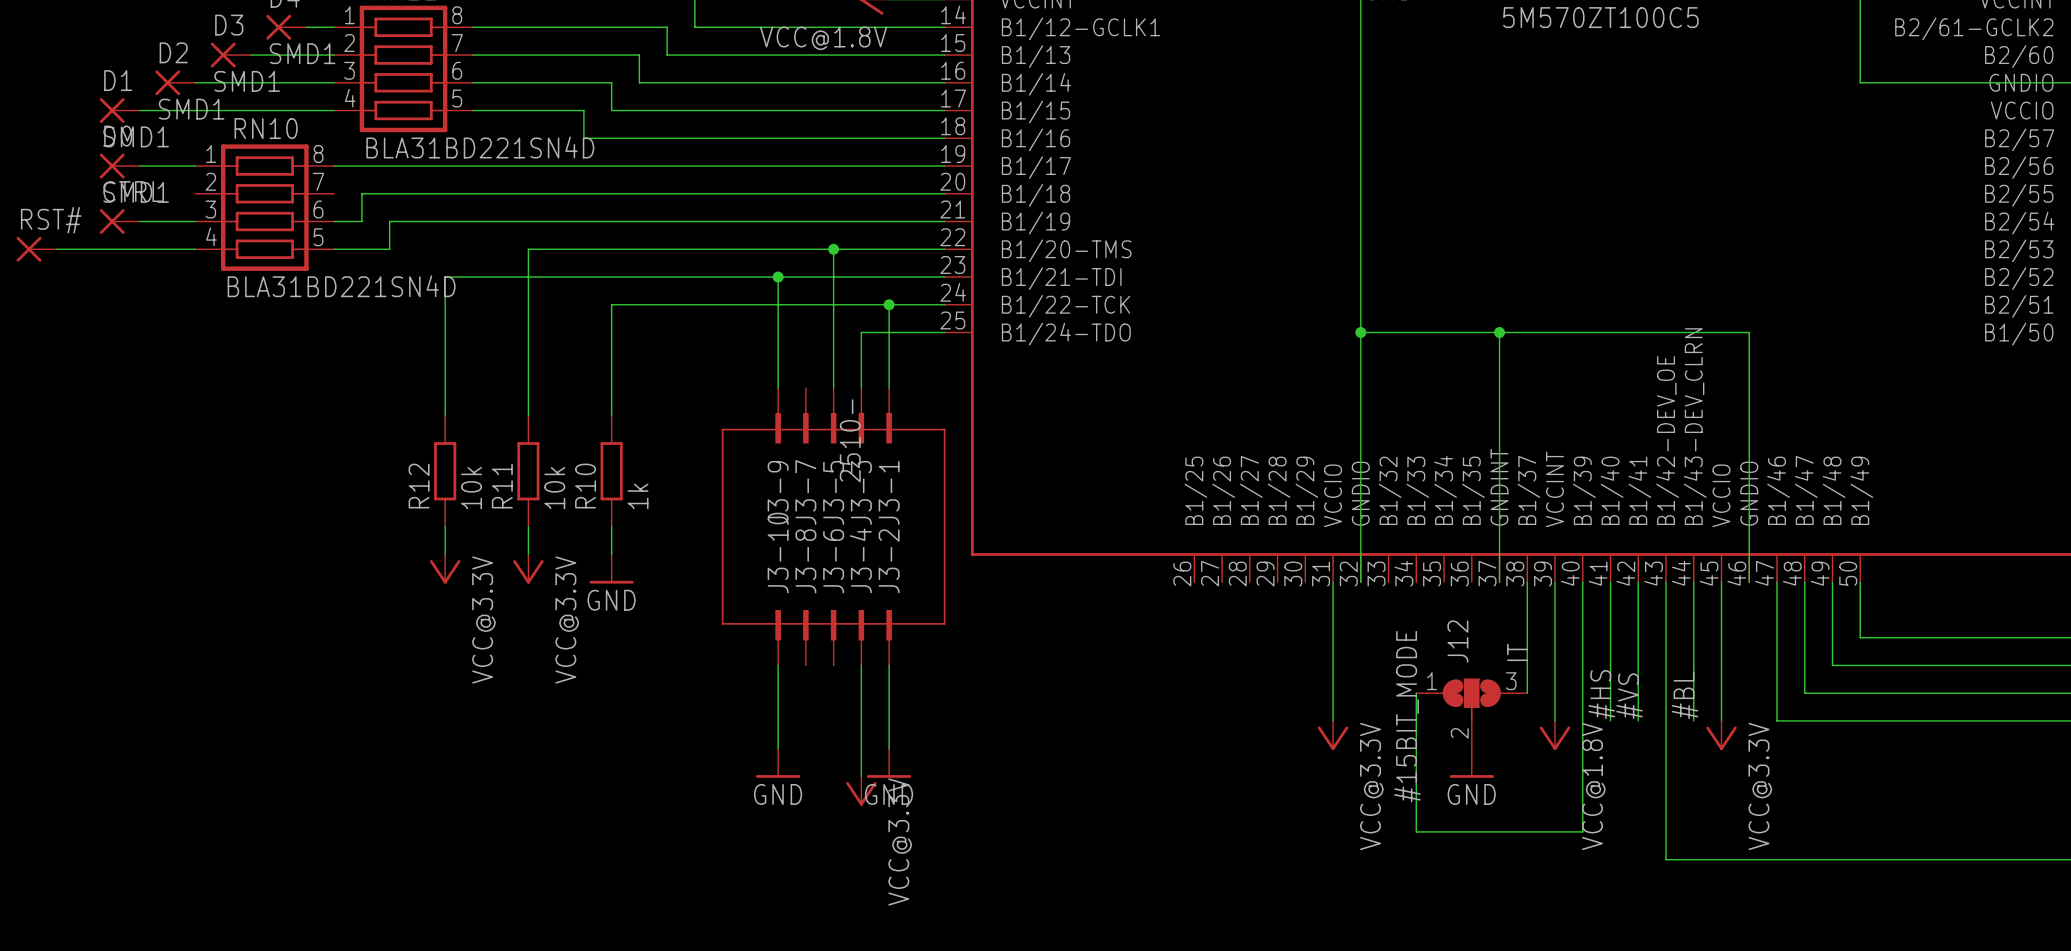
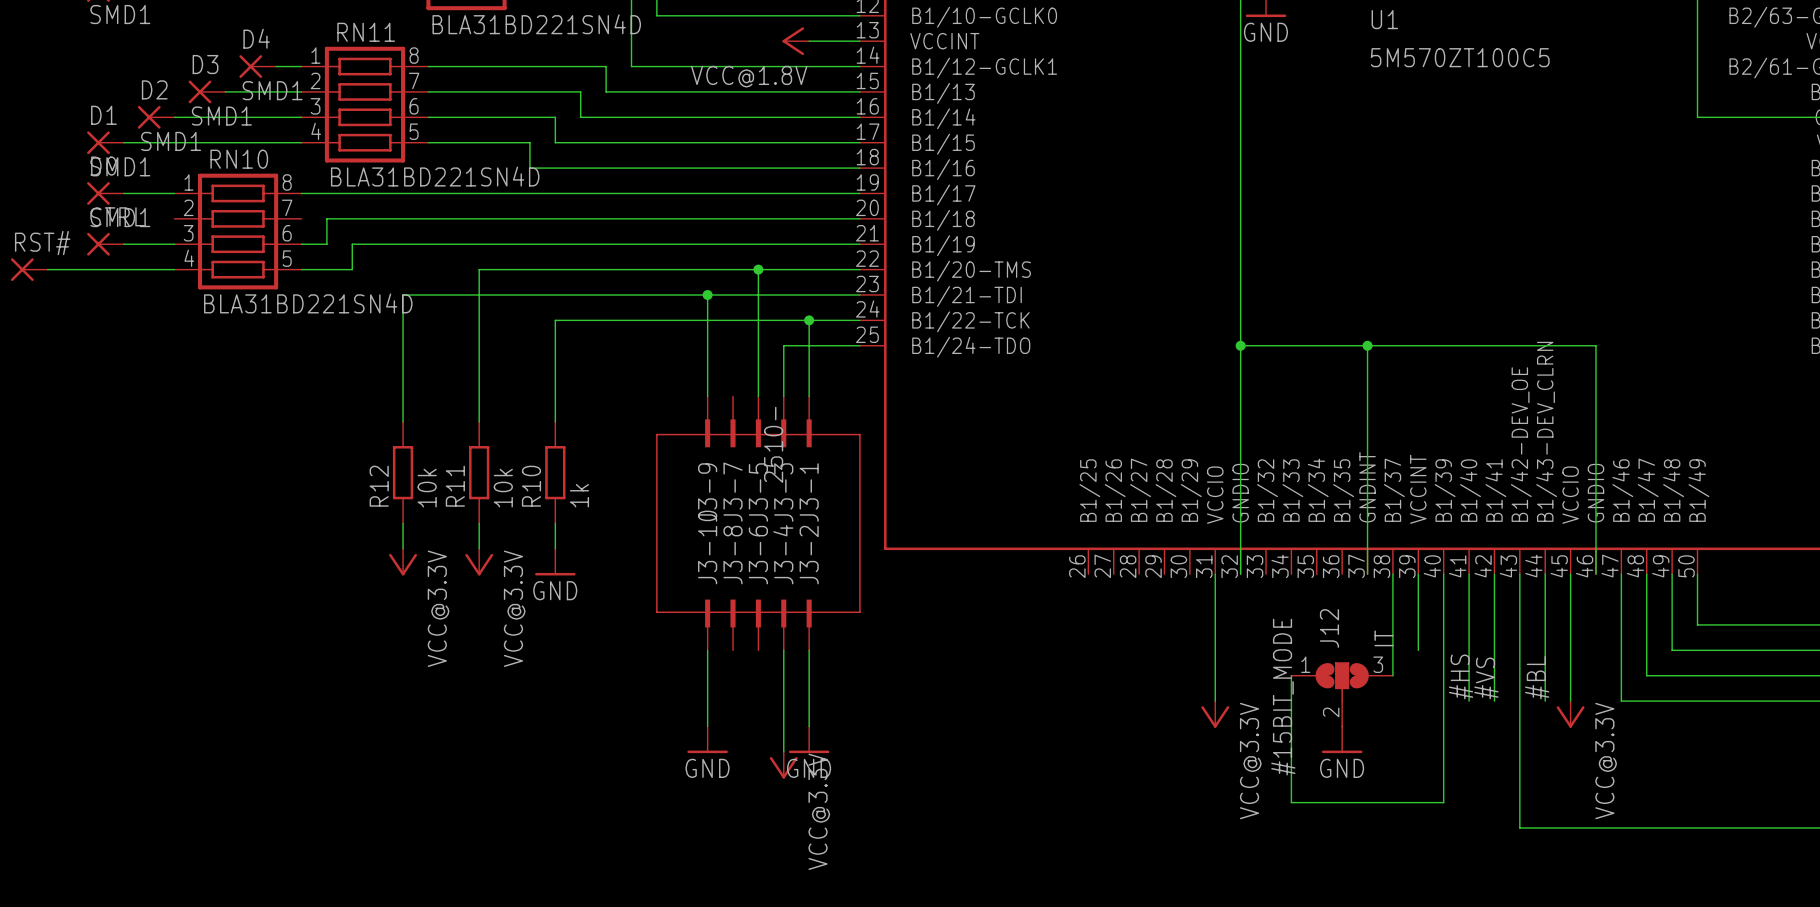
wire: (1555, 665) (1555, 720) -> none
power symbol: VCC@1.8V (1555, 735) -> none

